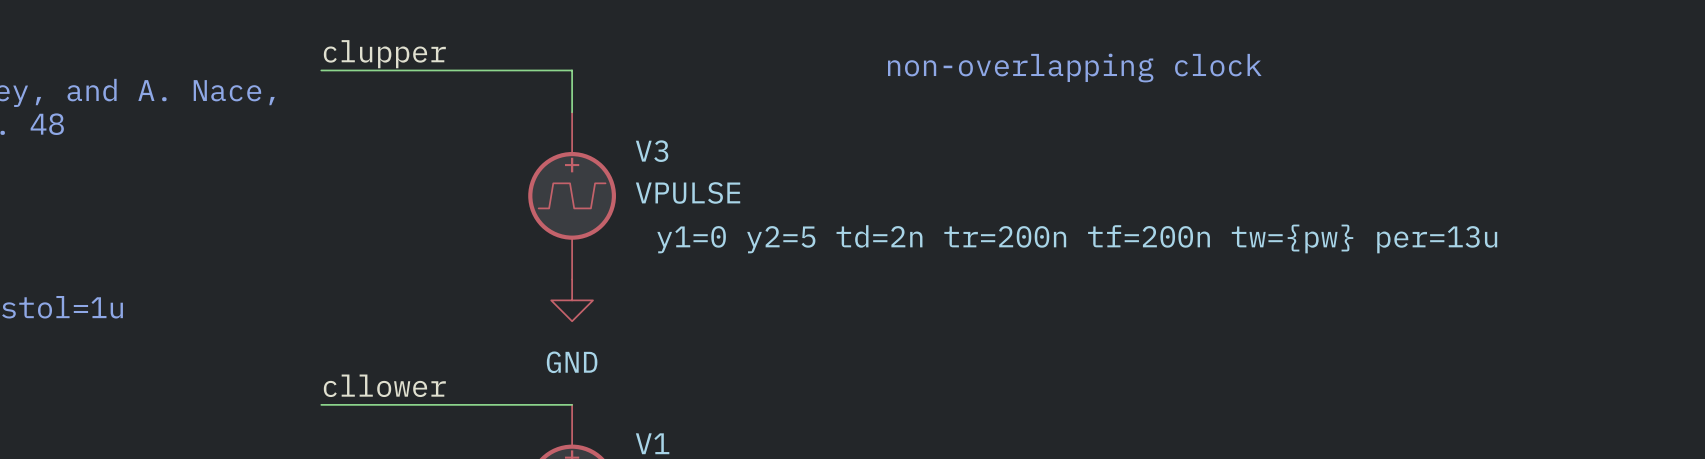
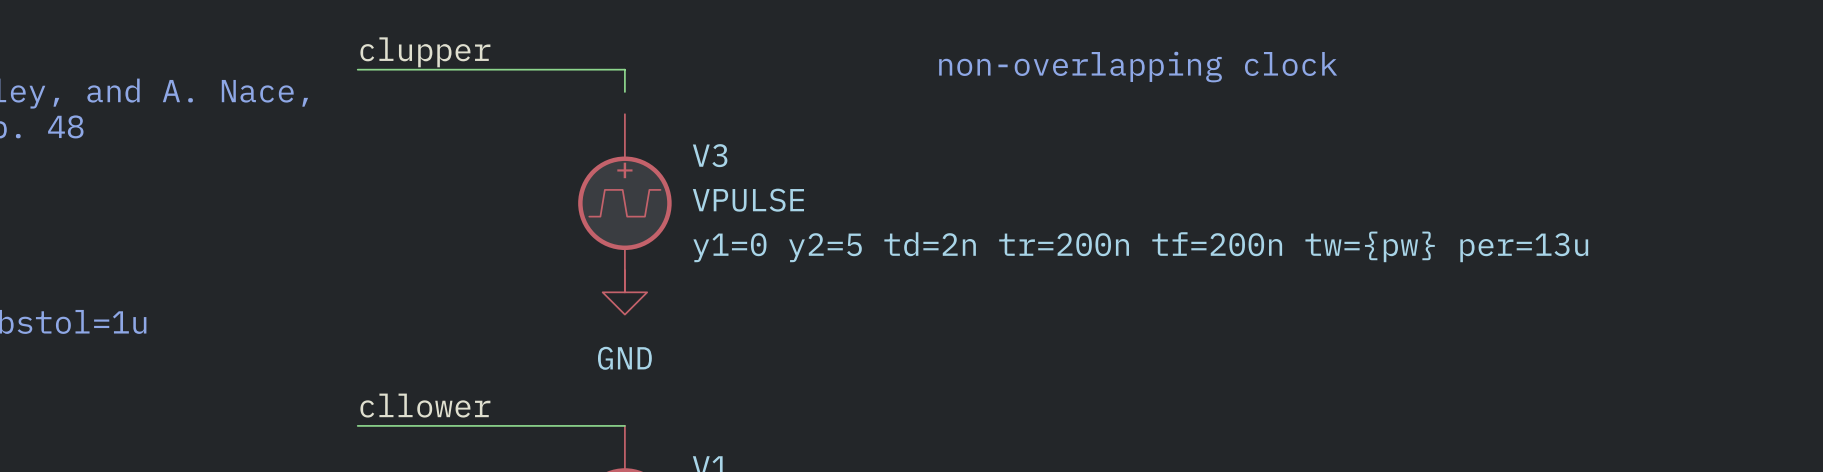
text position: non-overlapping clock (1074, 68) -> non-overlapping clock (1138, 67)
wire: (572, 91) (572, 112) -> none
V3 text position: y1=0 y2=5 td=2n tr=200n tf=200n tw={pw} per=13u (1077, 238) -> y1=0 y2=5 td=2n tr=200n tf=200n tw={pw} per=13u (1140, 246)
power symbol position: GND (572, 300) -> GND (624, 292)

